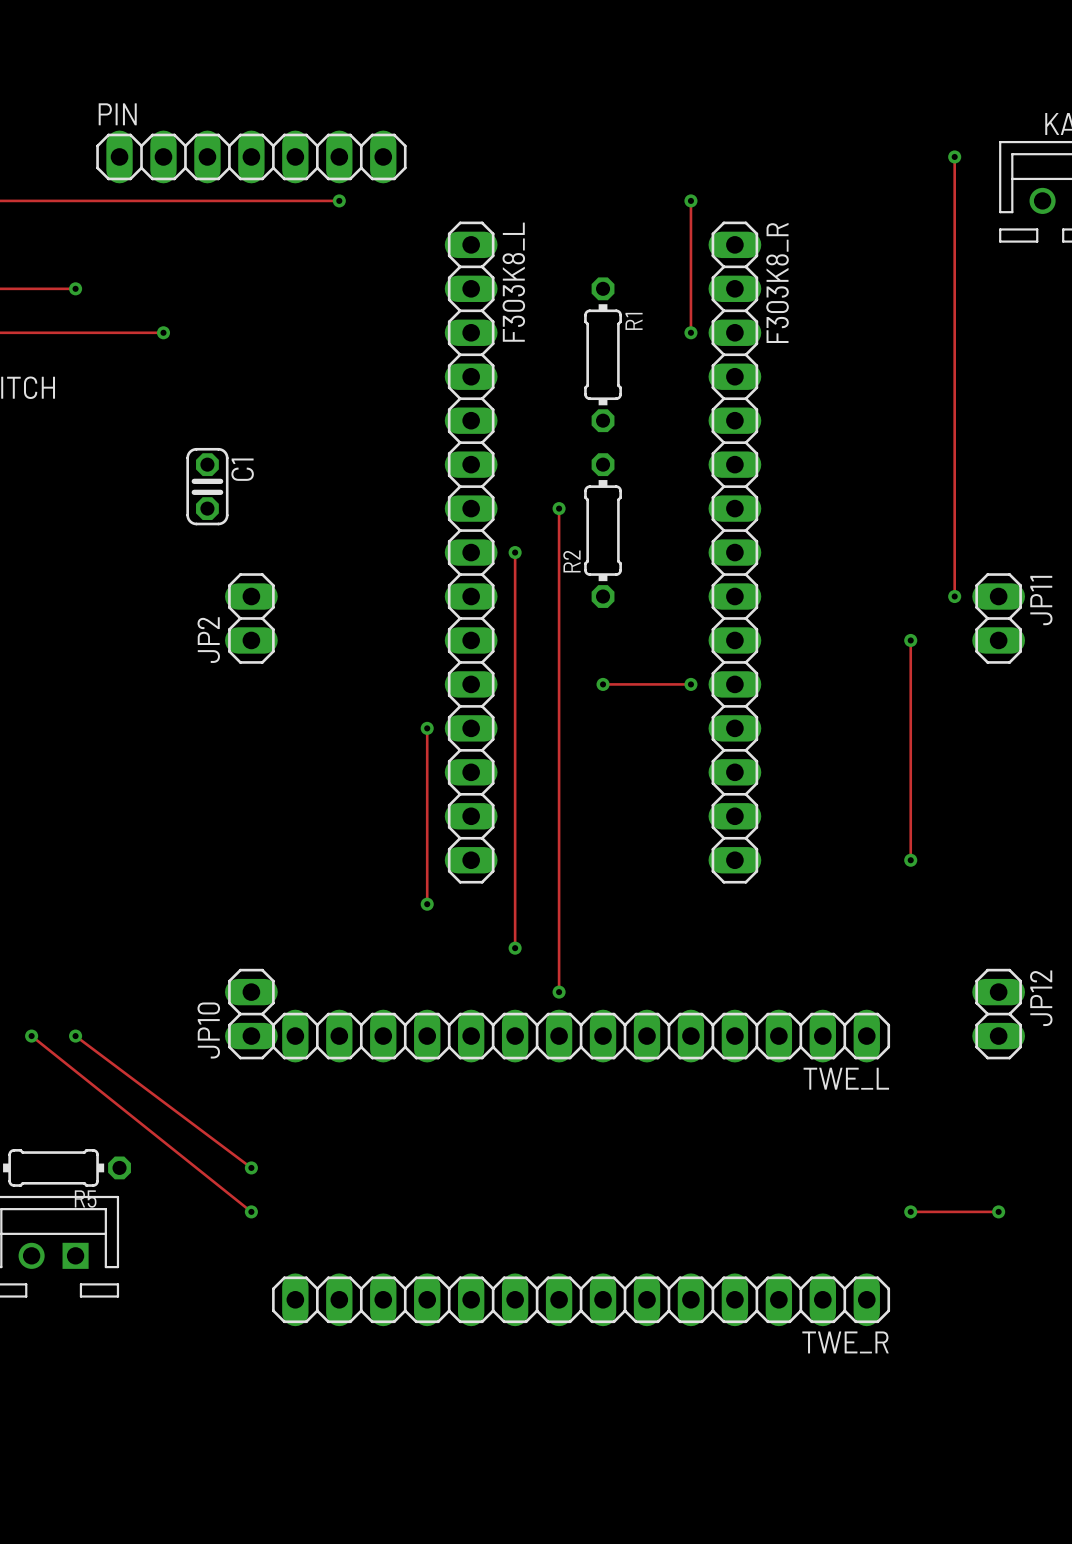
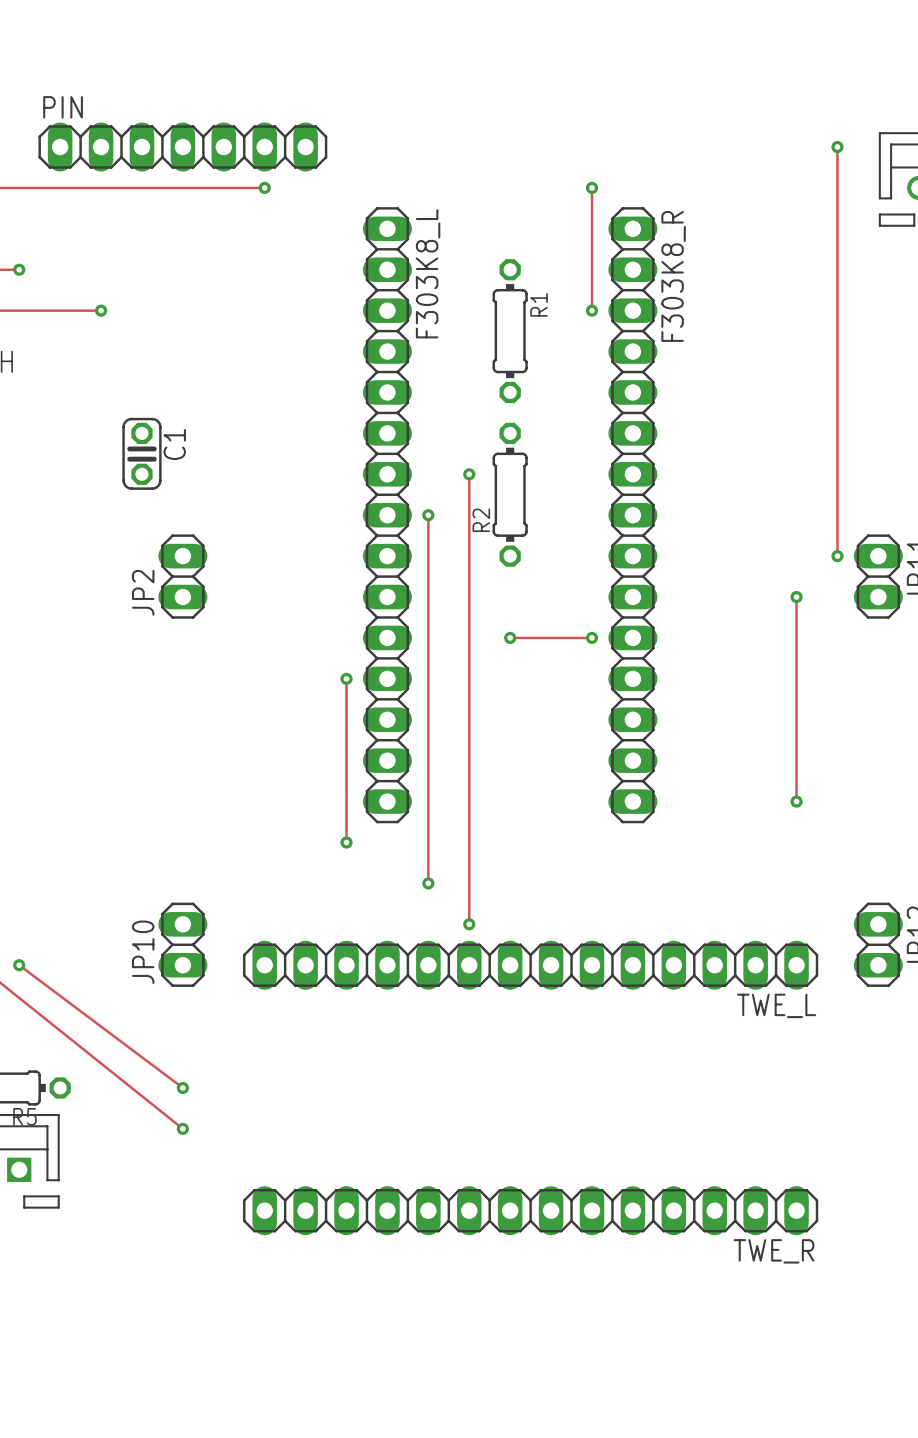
TWE_L position: (581, 1036) -> (530, 965)
track: (910, 1211) (998, 1211) -> none
via: (910, 1211) -> none
via: (998, 1211) -> none
TWE_R position: (581, 1299) -> (530, 1210)

